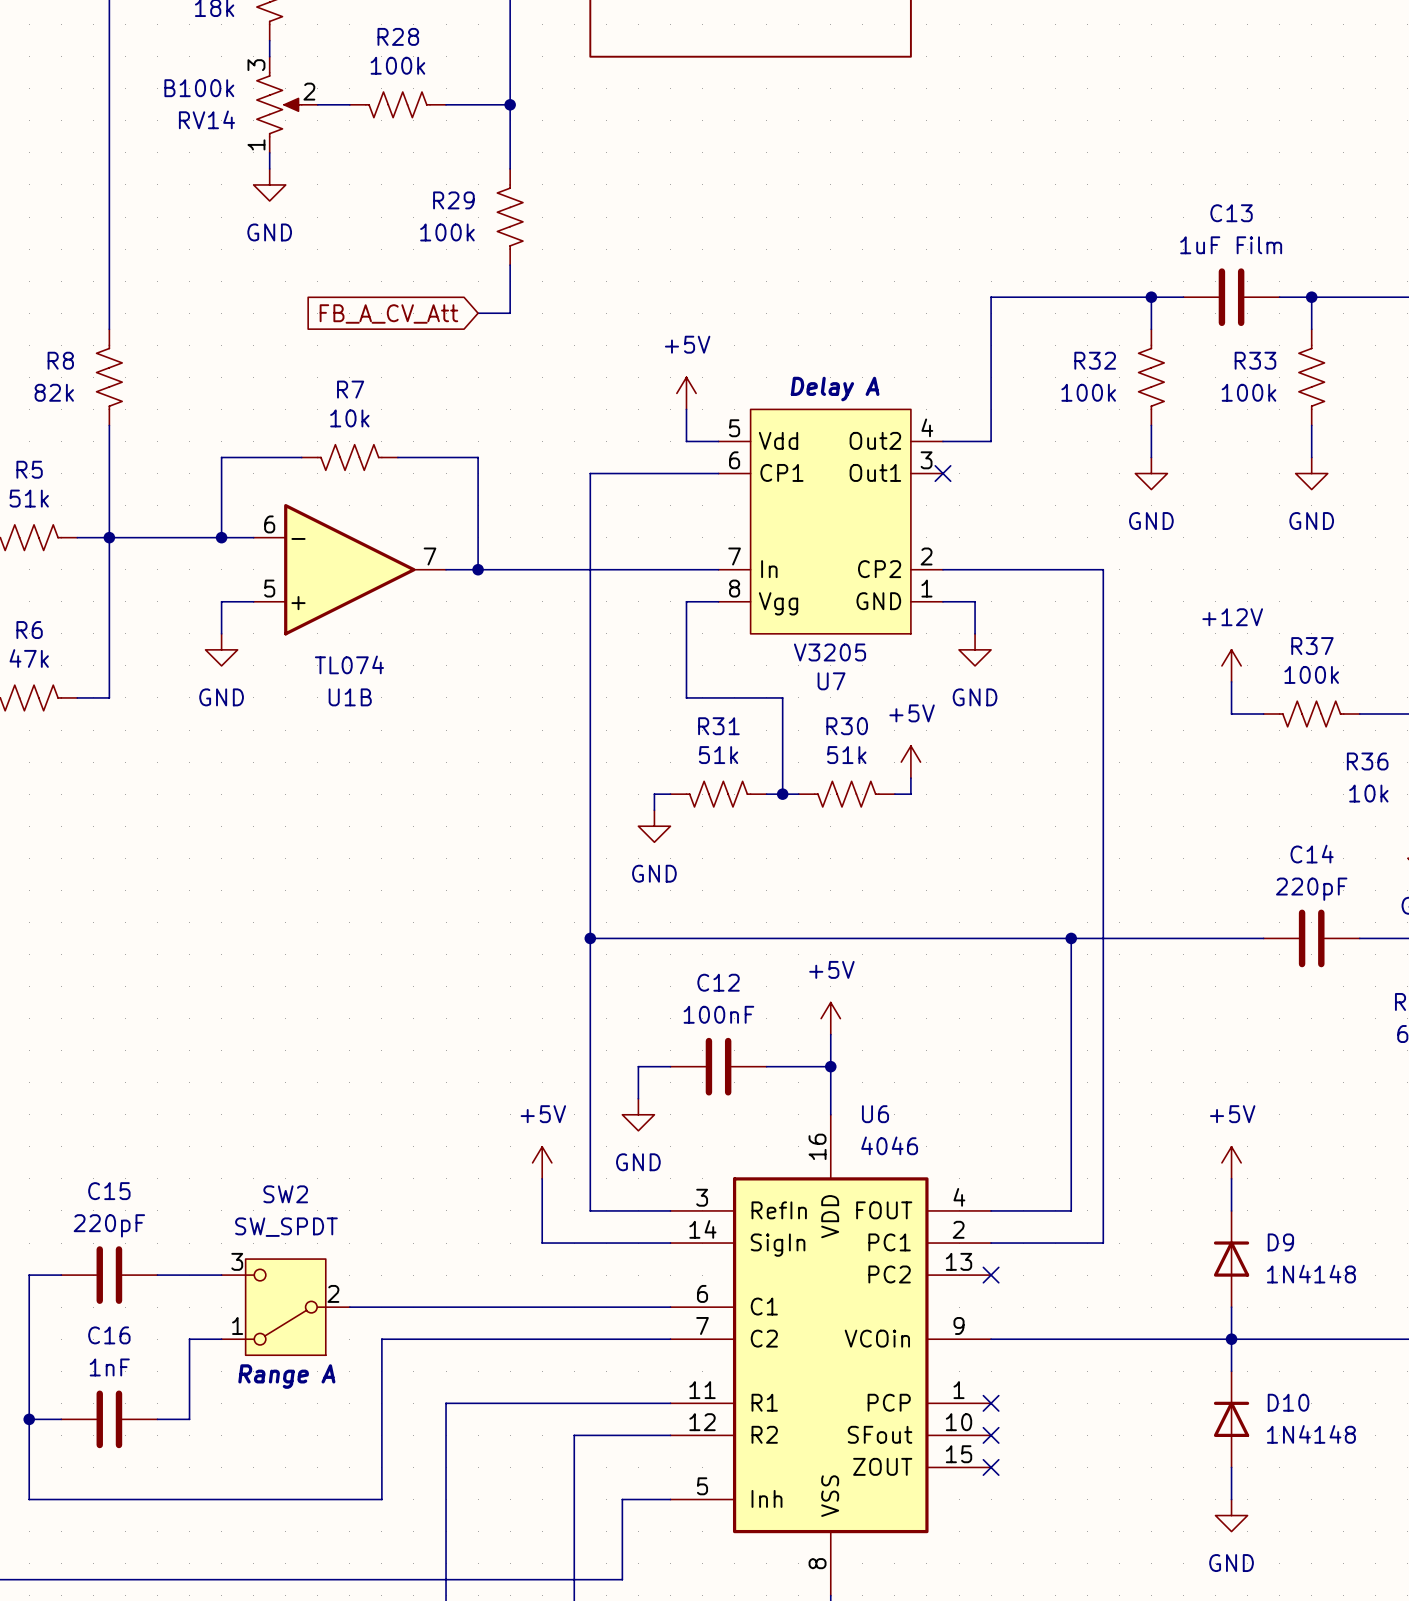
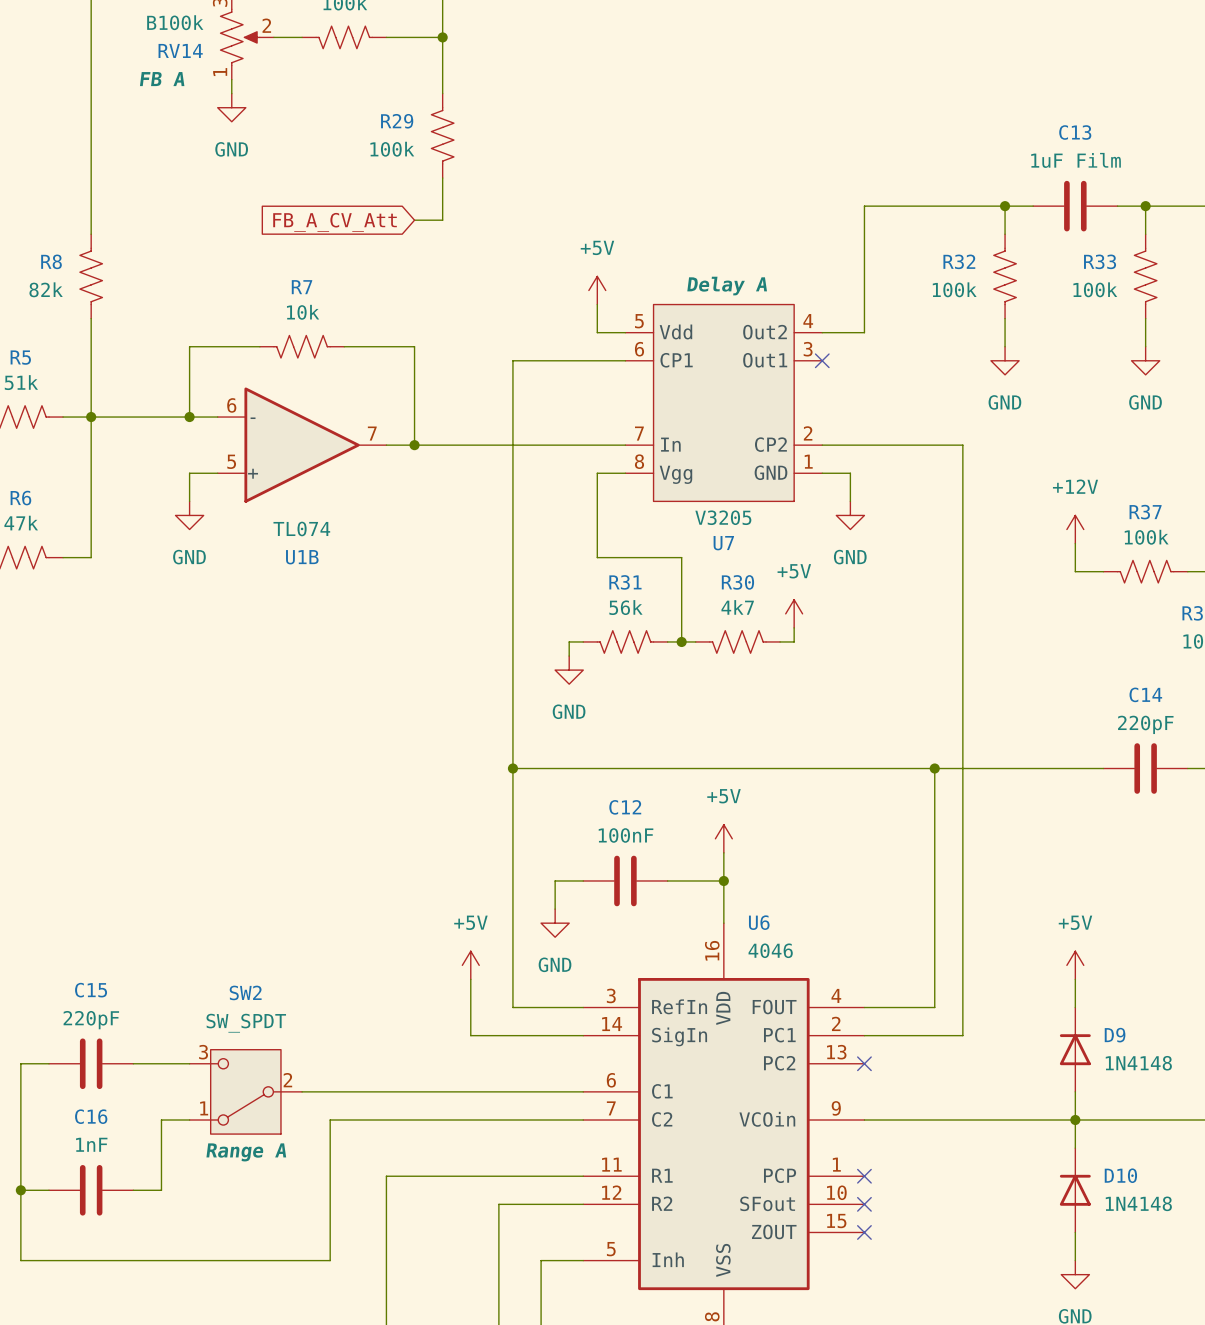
RV14 text: none -> FB A (162, 79)
R31 value: 51k (718, 755) -> 56k (625, 607)
R30 value: 51k (846, 755) -> 4k7 (737, 607)

